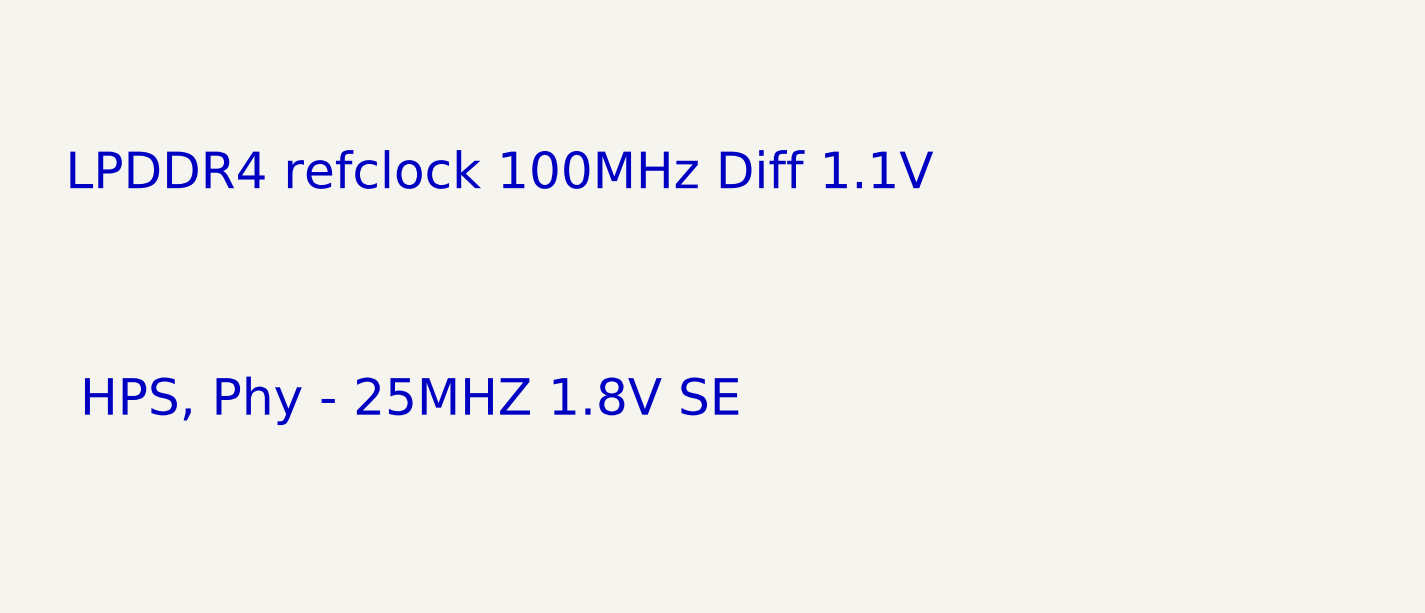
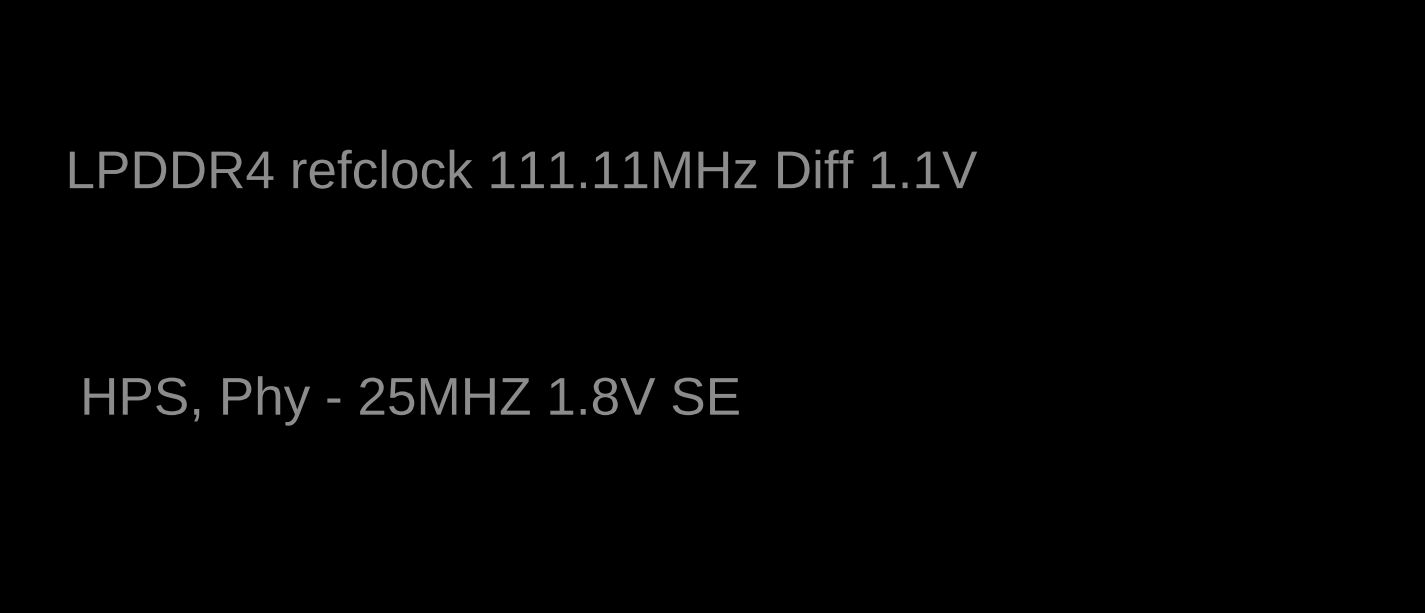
text: LPDDR4 refclock 100MHz Diff 1.1V (501, 169) -> LPDDR4 refclock 111.11MHz Diff 1.1V (523, 169)

